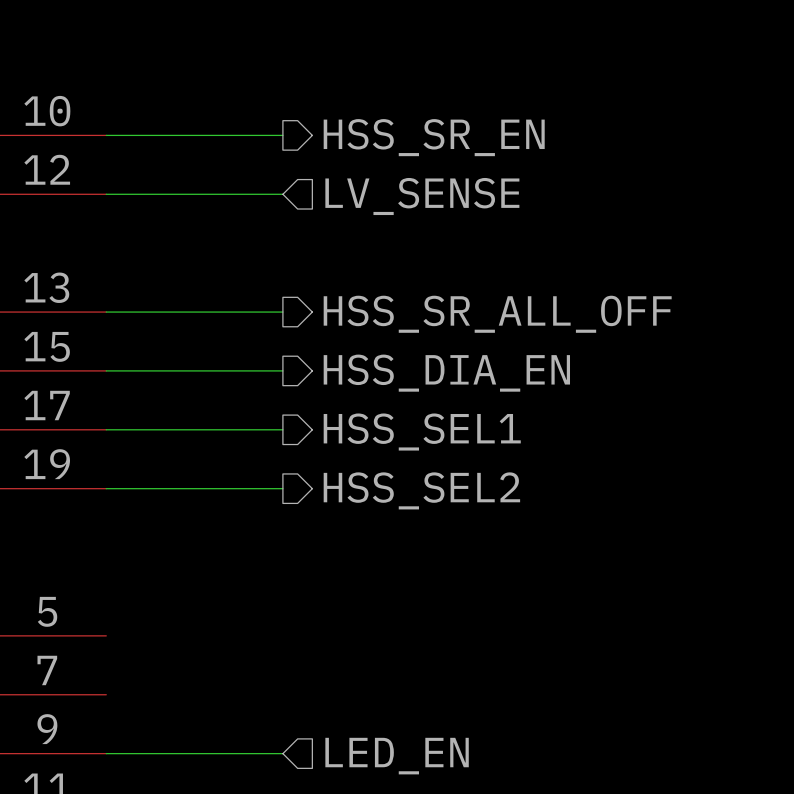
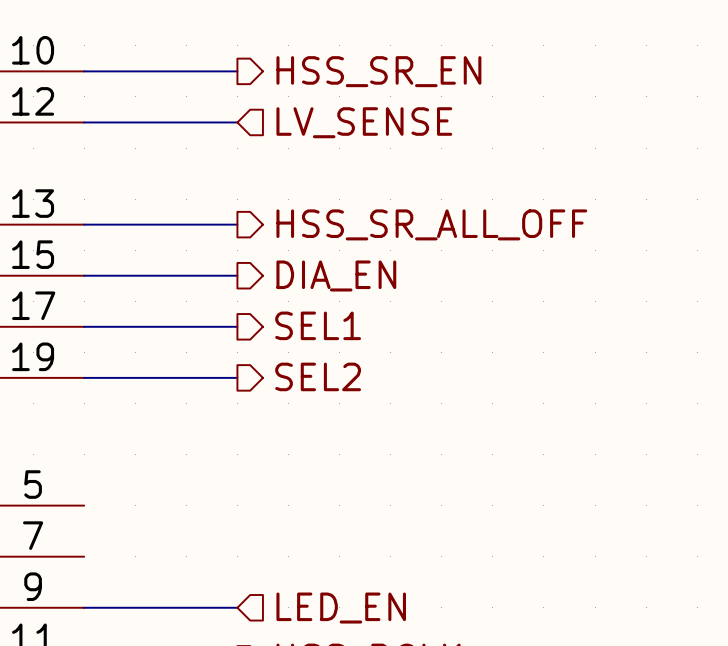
hierarchical label: HSS_DIA_EN (446, 373) -> DIA_EN (336, 275)
hierarchical label: HSS_SEL1 (422, 432) -> SEL1 (318, 325)
hierarchical label: HSS_SEL2 (421, 490) -> SEL2 (318, 376)

